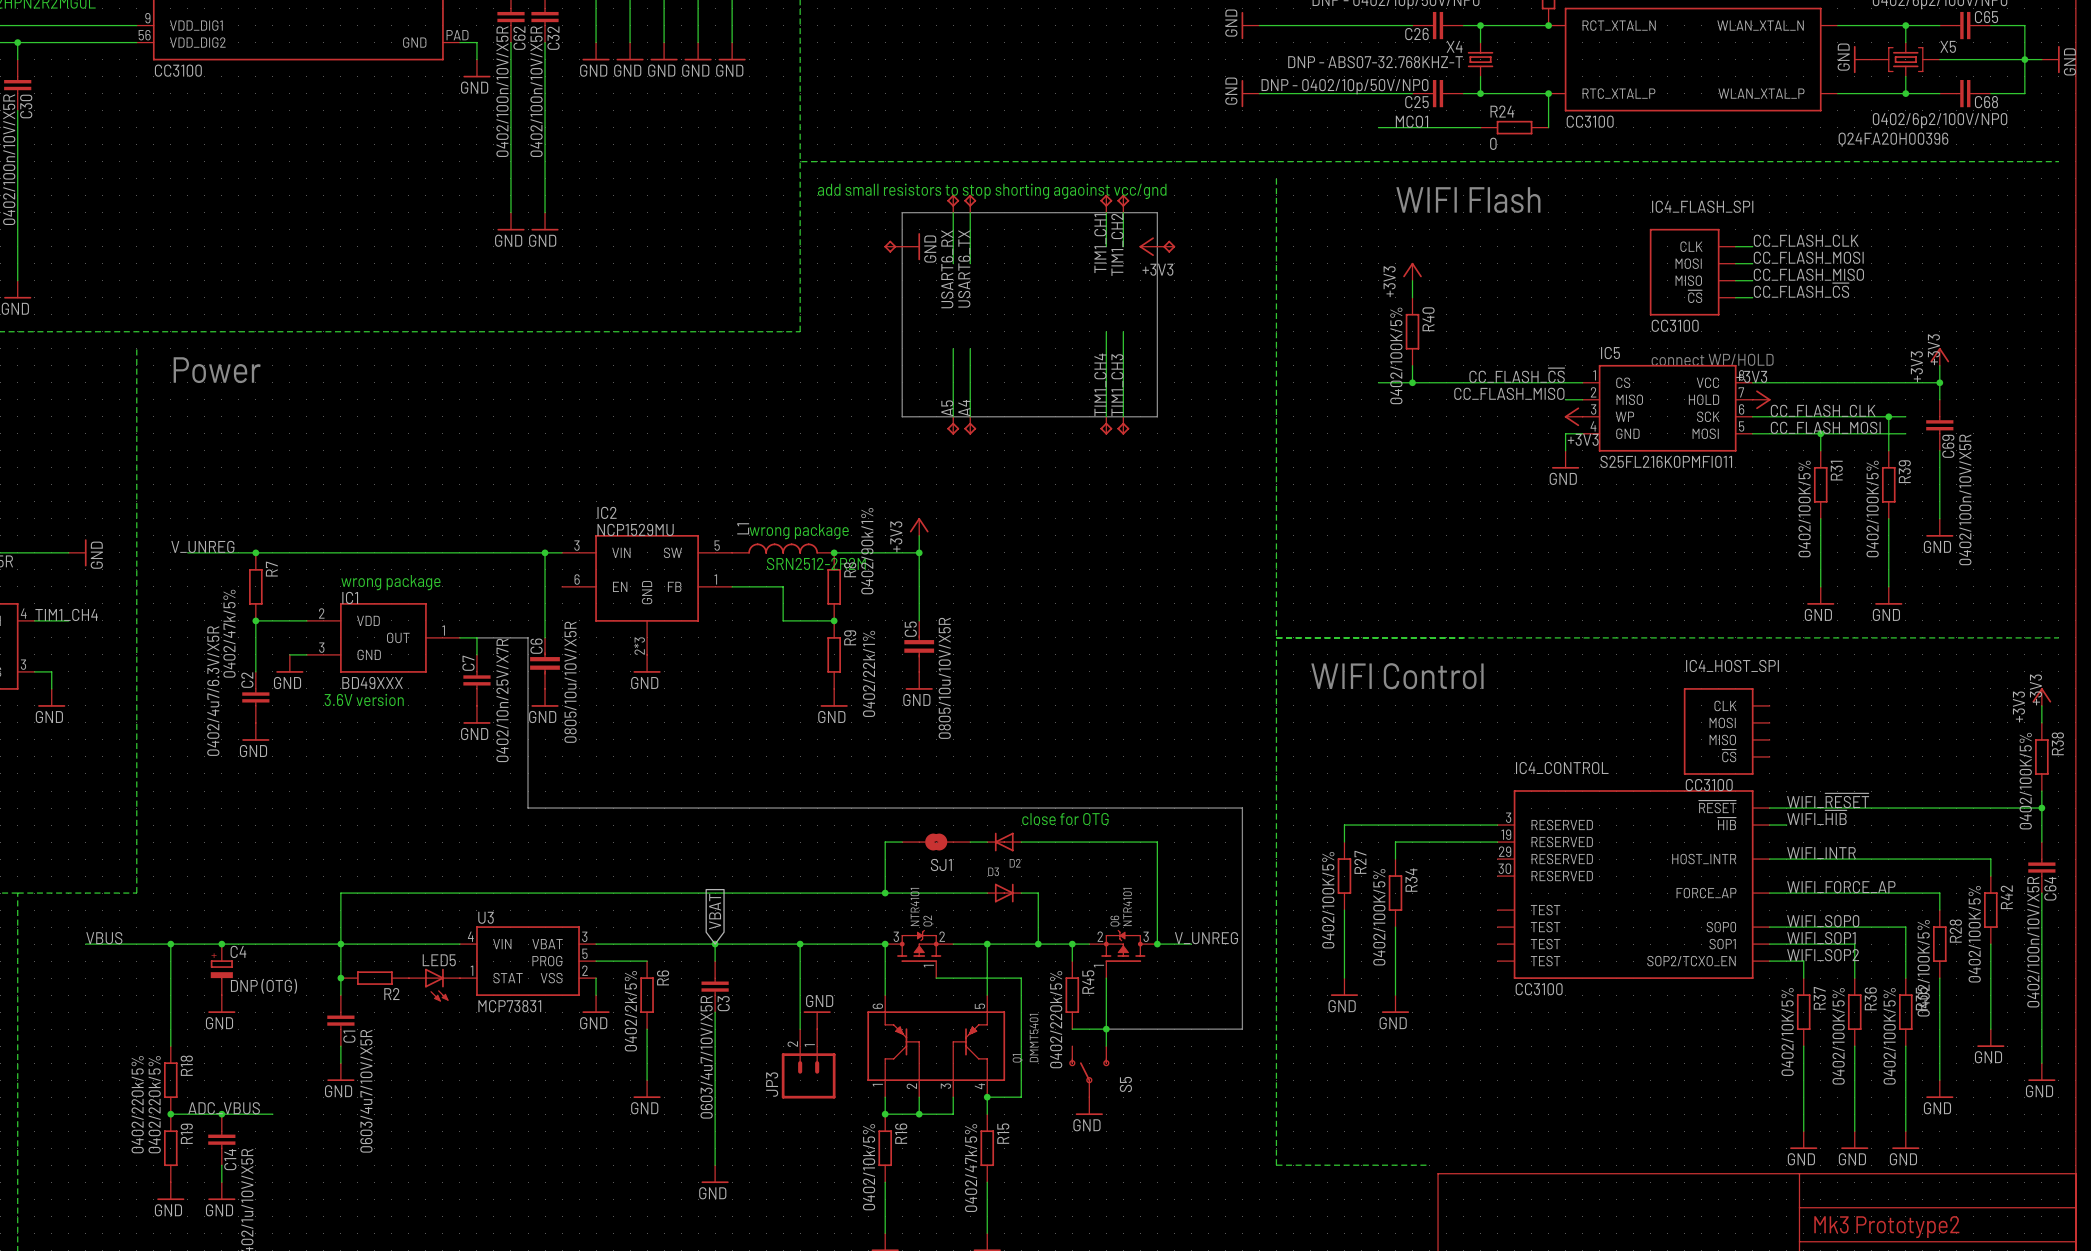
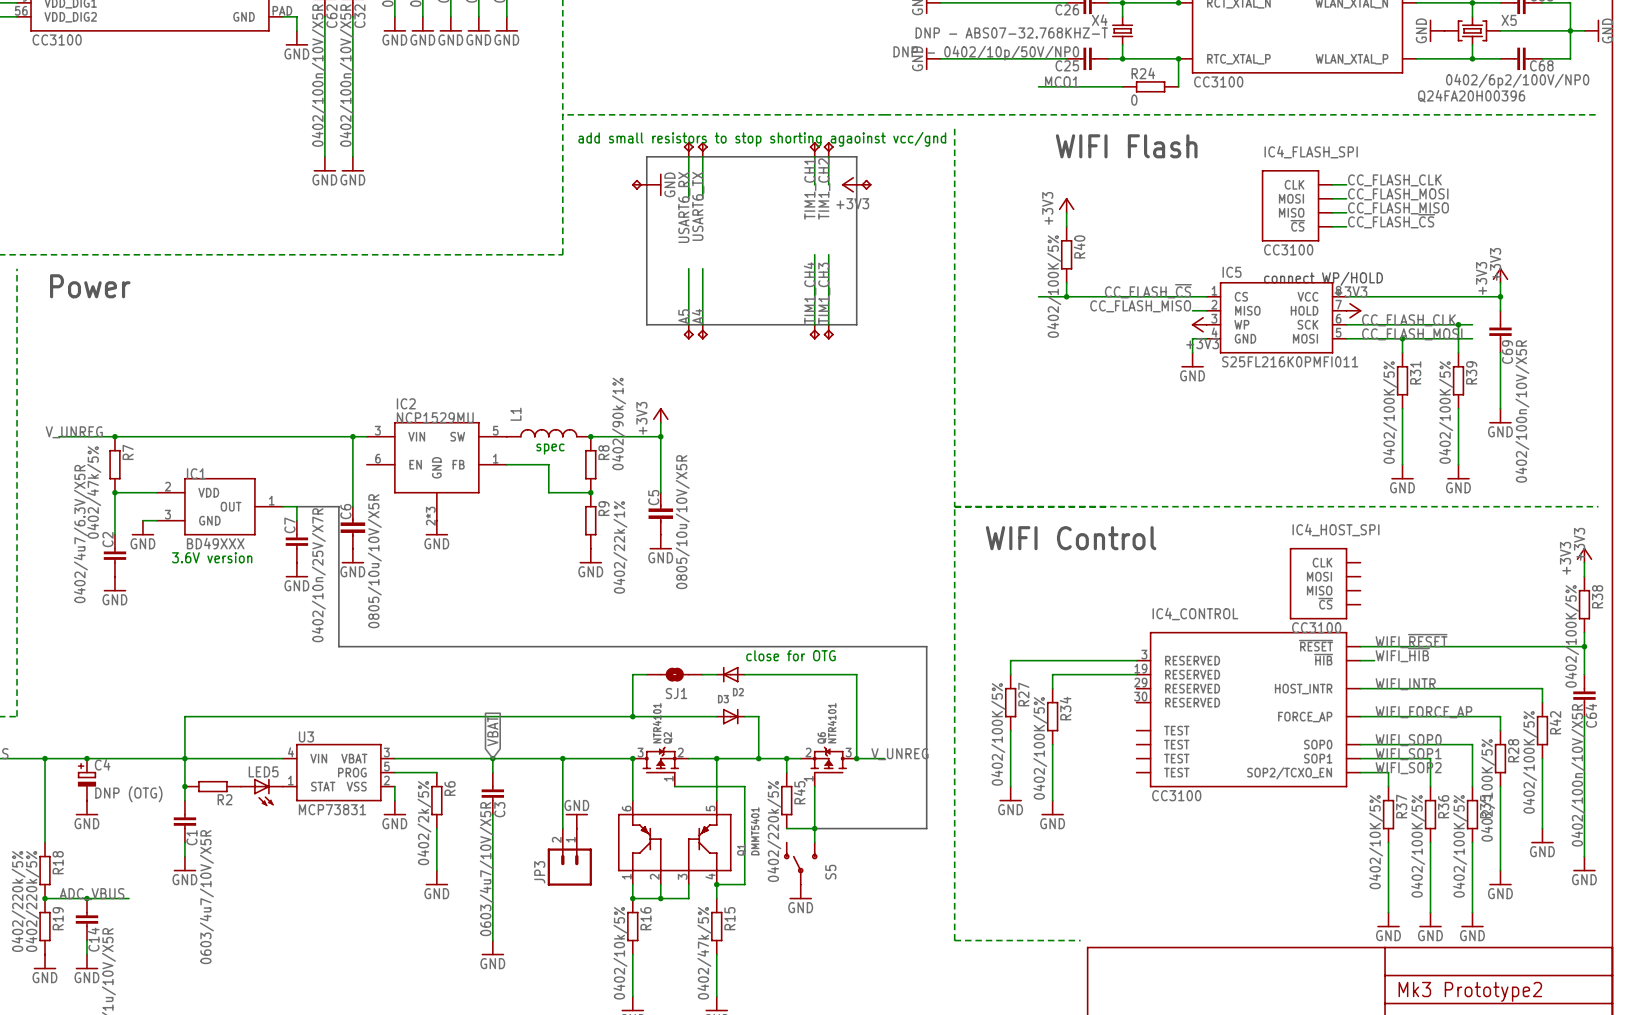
text: wrong package (799, 531) -> none
text: SRN2512-2R2M (816, 563) -> spec (550, 449)
text: wrong package (390, 582) -> none

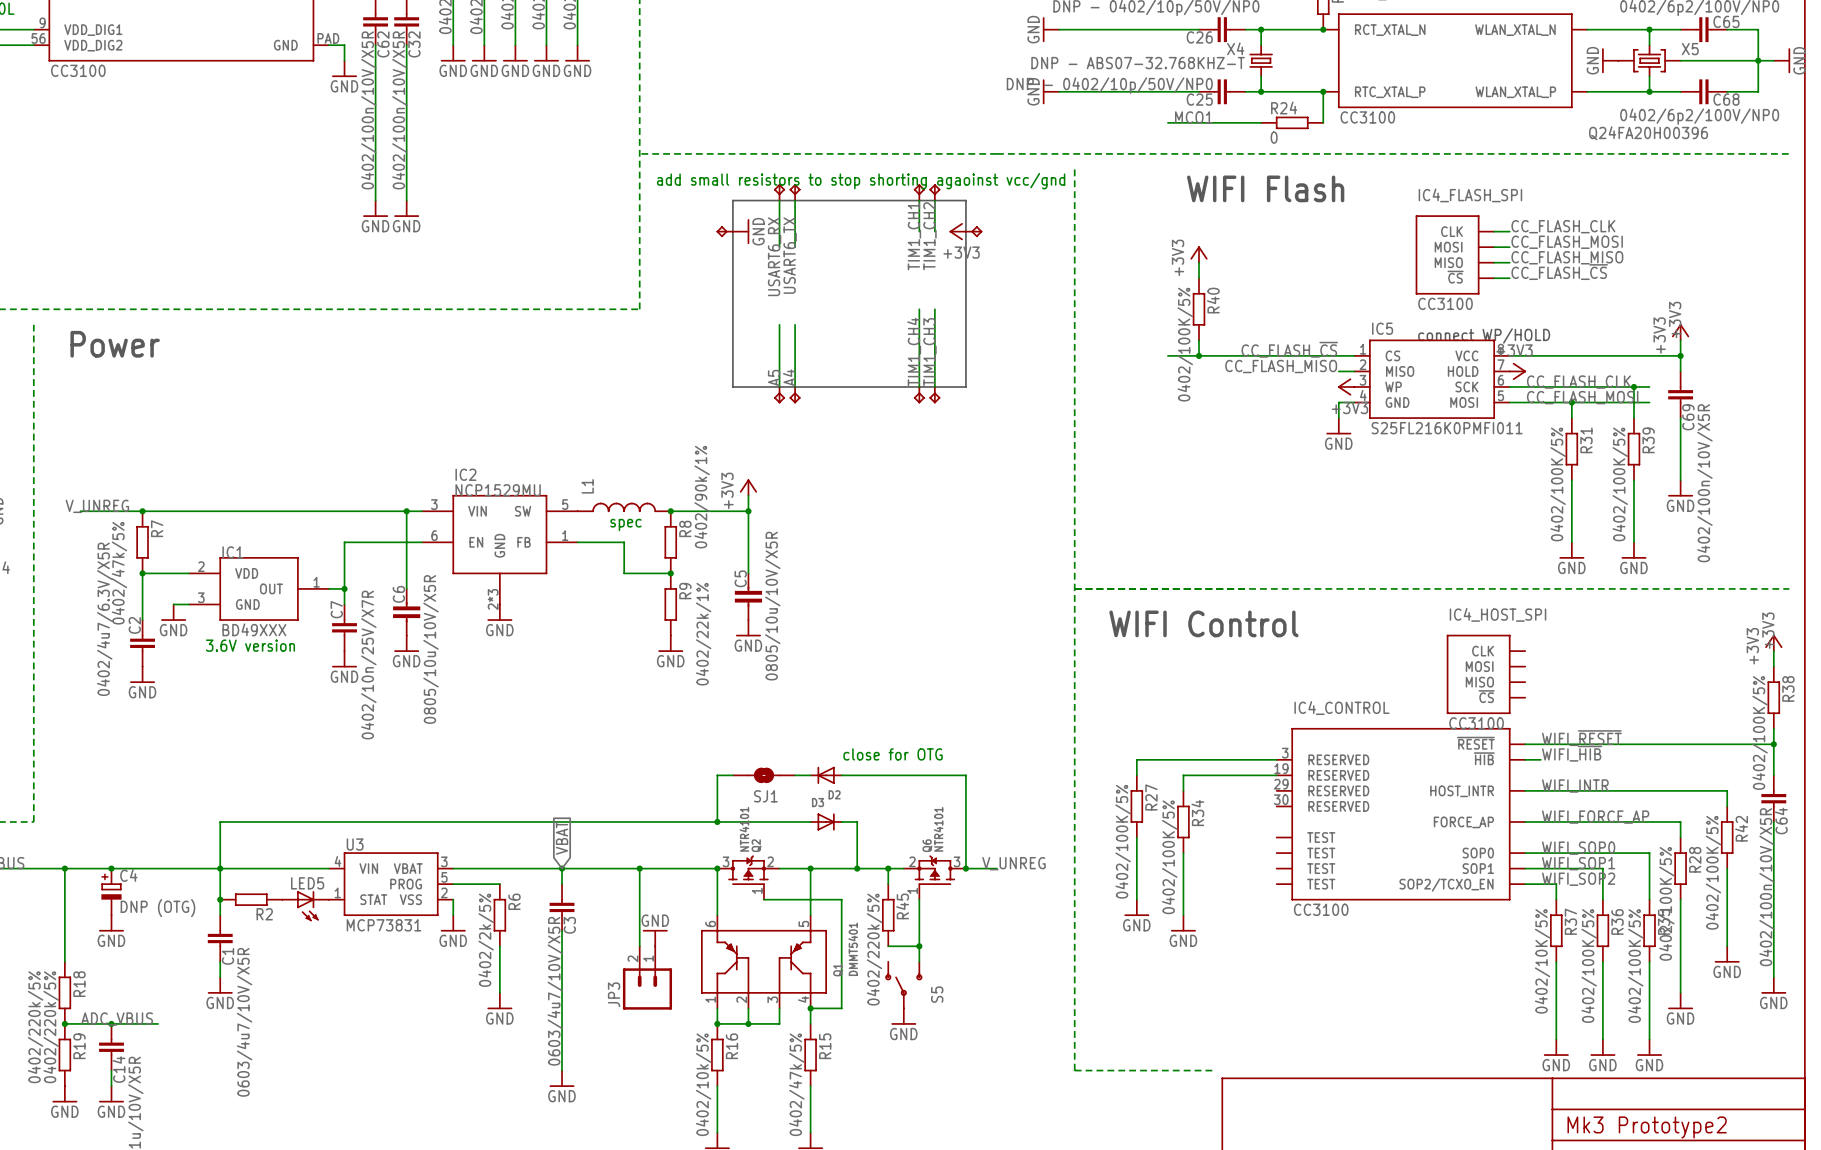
wire: none -> (422, 542) (344, 542) (344, 588)
line: (296, 506) (338, 506) (338, 646) (926, 646) (926, 828) (814, 828) -> none
junction: none -> (344, 588)

